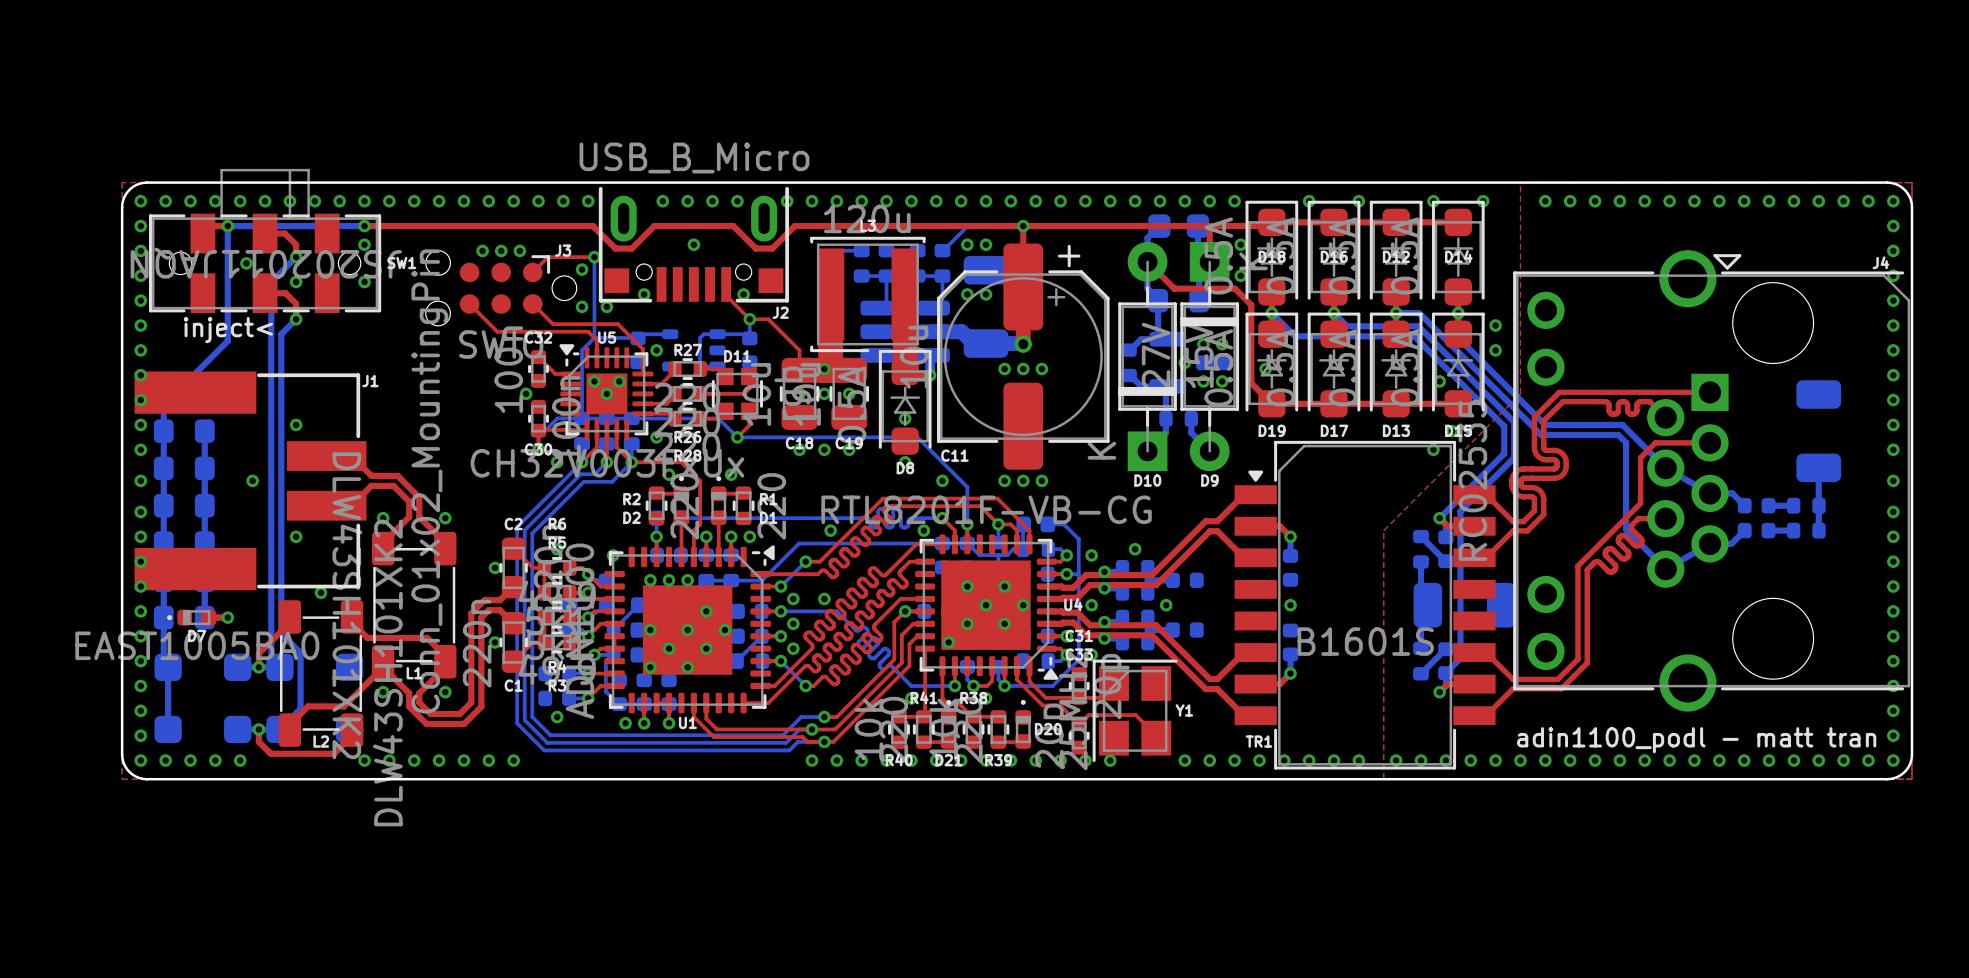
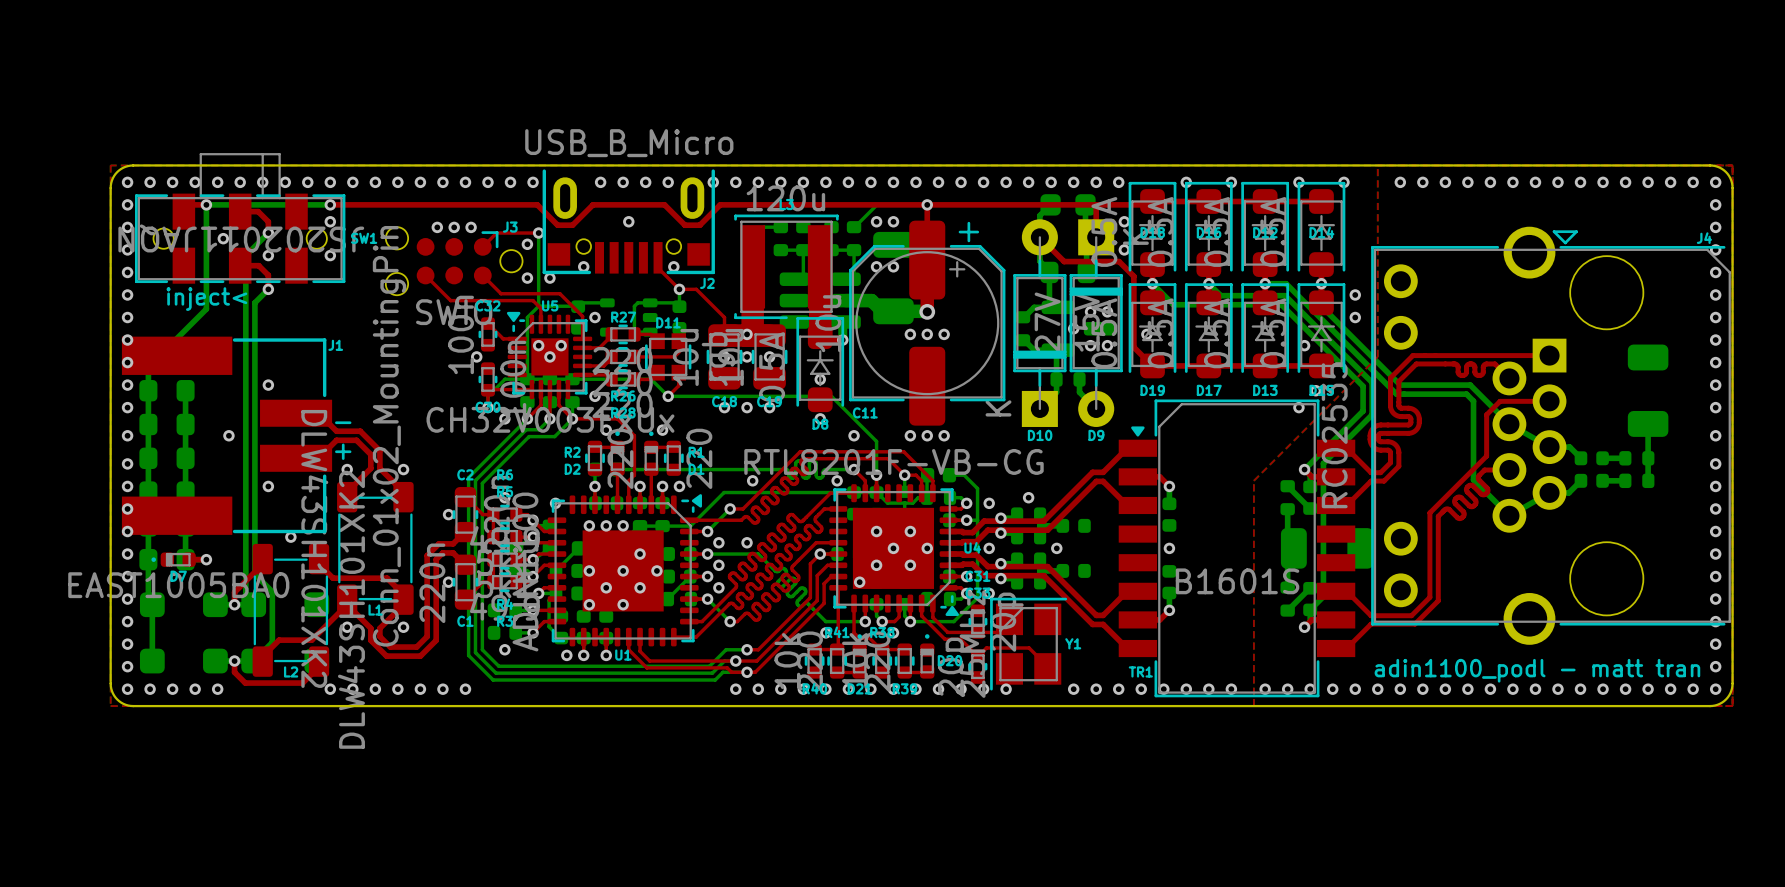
text: none -> - (343, 422)
text: none -> + (343, 451)

